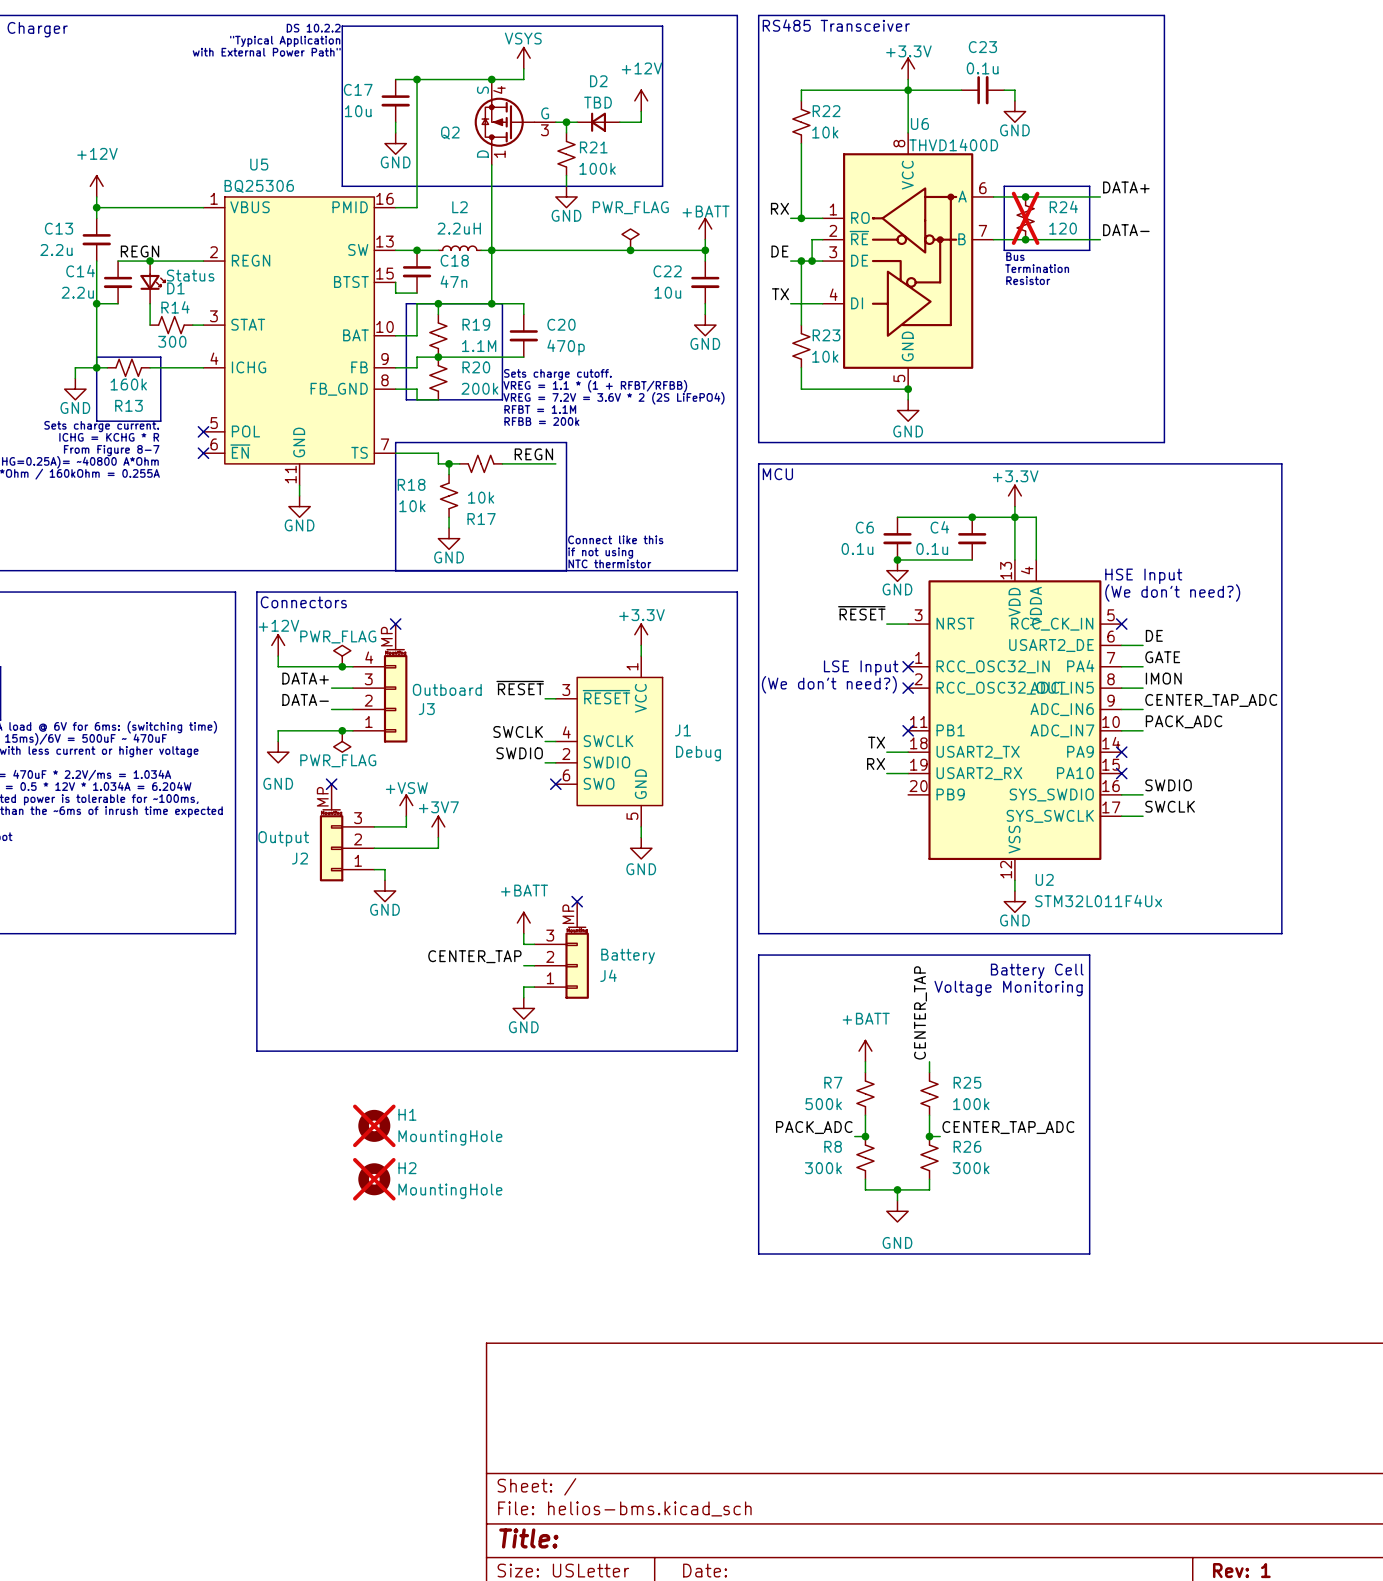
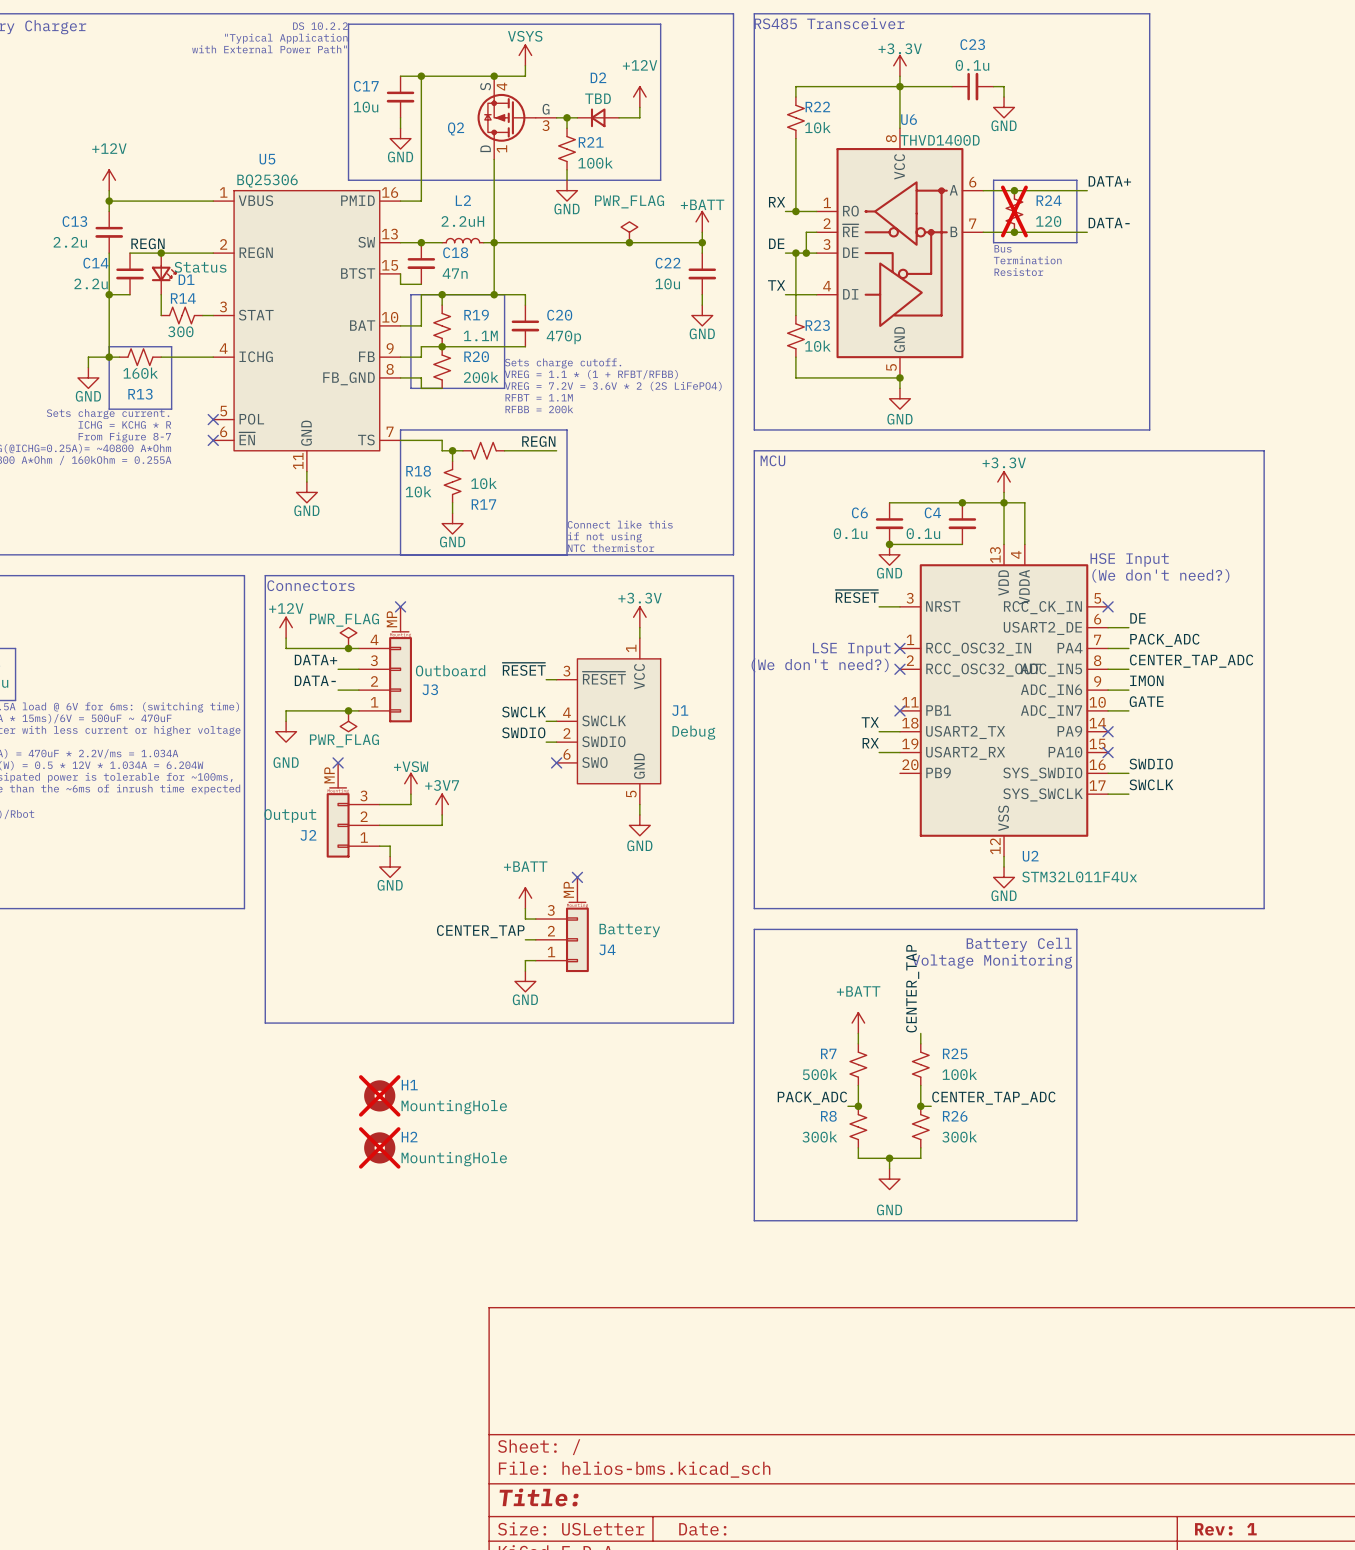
label: GATE (1162, 657) -> PACK_ADC (1164, 640)
label: IMON (1163, 678) -> CENTER_TAP_ADC (1191, 661)
label: CENTER_TAP_ADC (1211, 700) -> IMON (1146, 680)
label: PACK_ADC (1184, 721) -> GATE (1146, 701)

